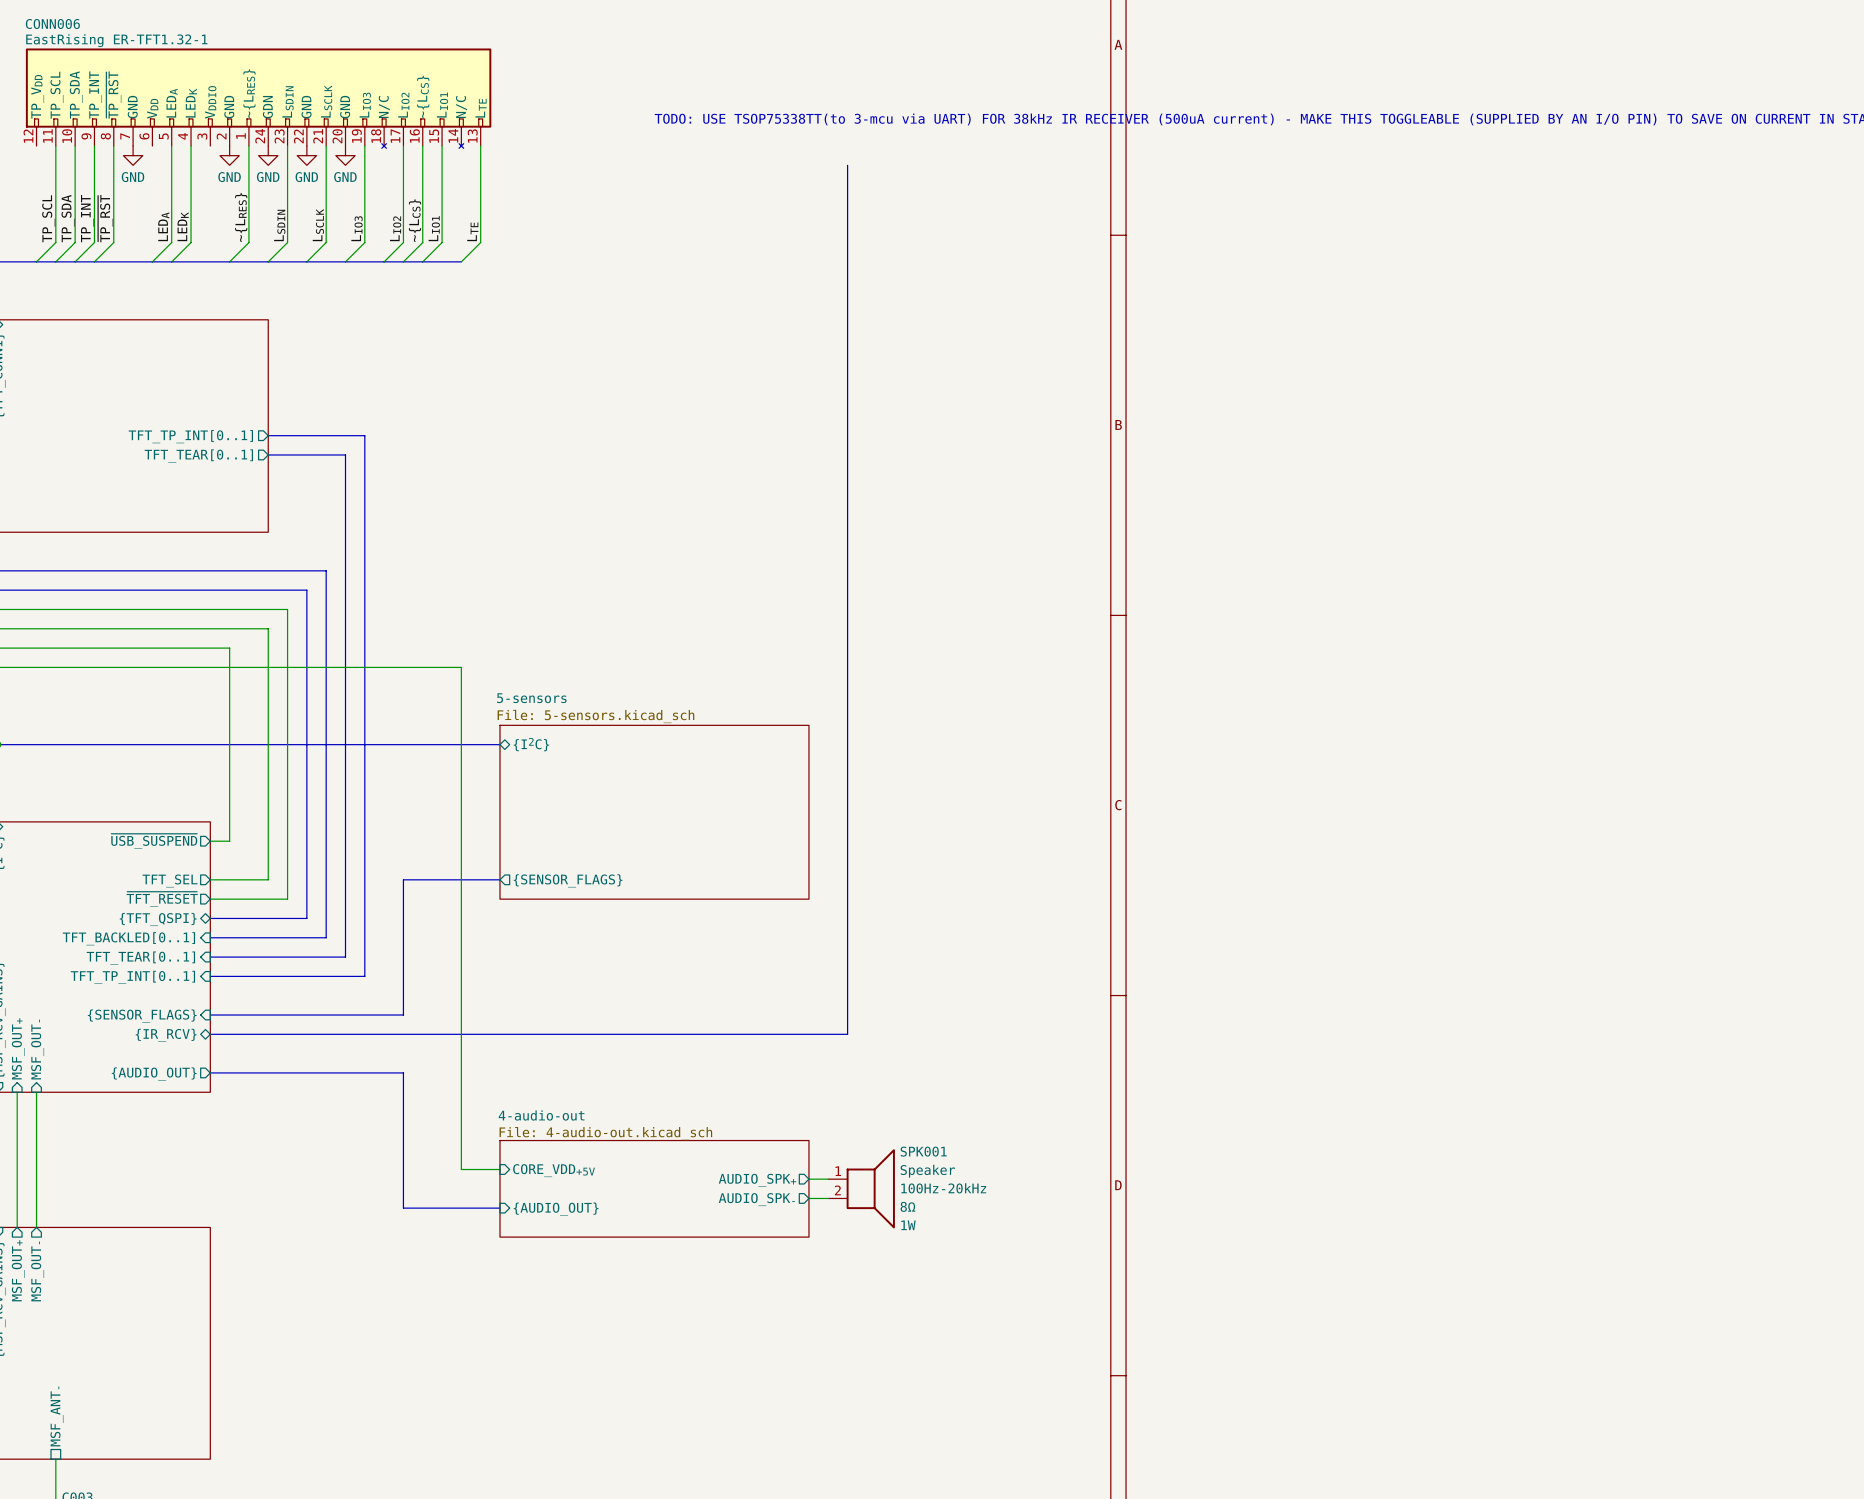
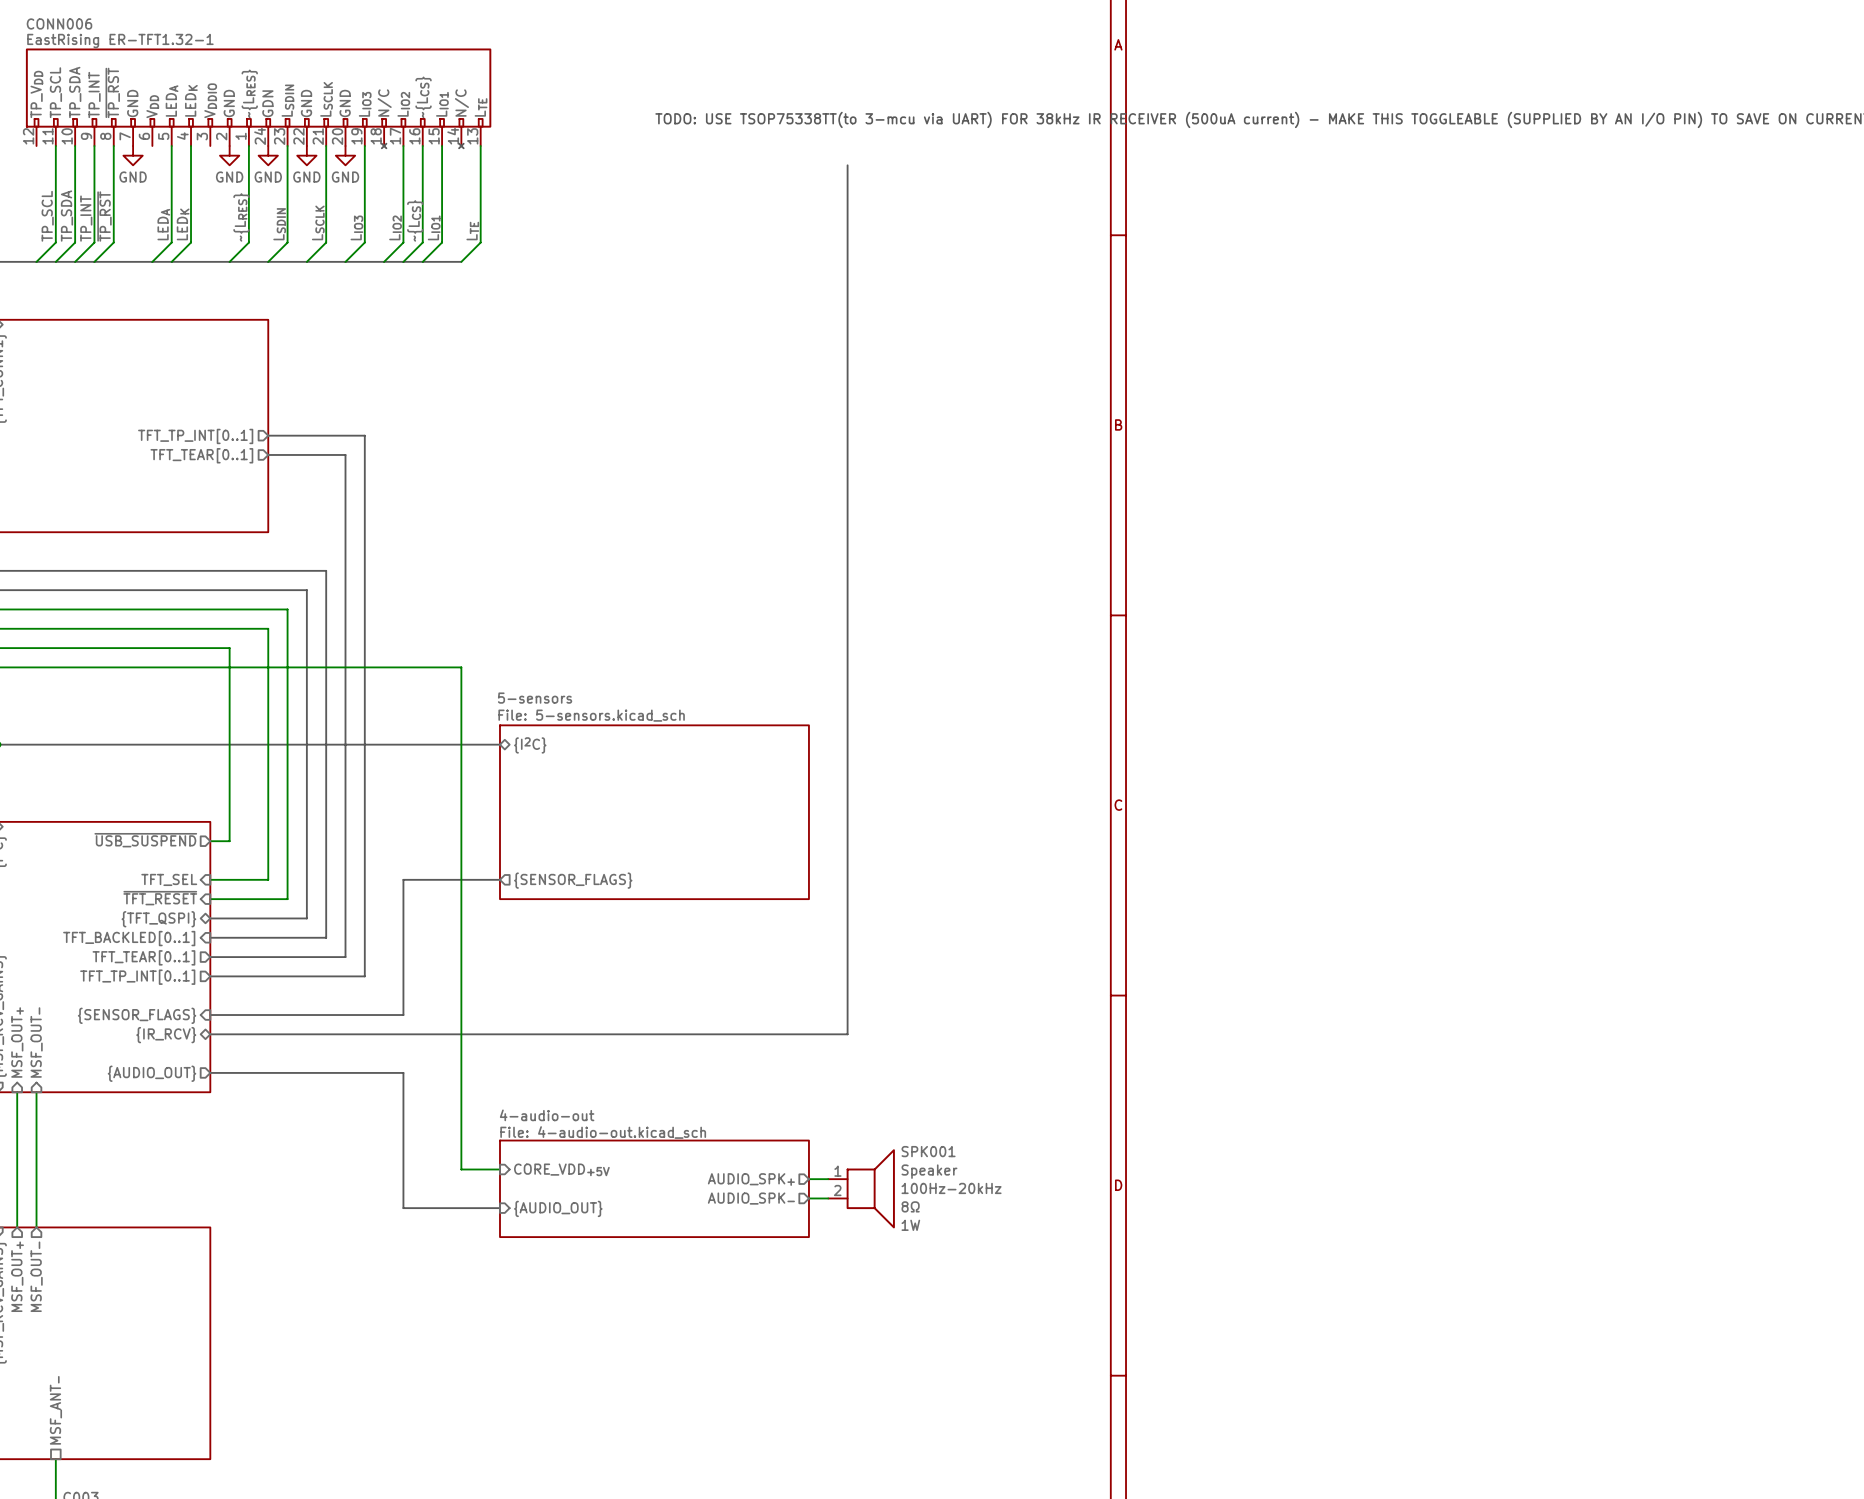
sheet pin shape: output (170, 880) -> input (169, 879)
sheet pin shape: output (162, 899) -> input (160, 898)
sheet pin shape: input (140, 958) -> output (143, 957)
sheet pin shape: input (132, 977) -> output (137, 977)

